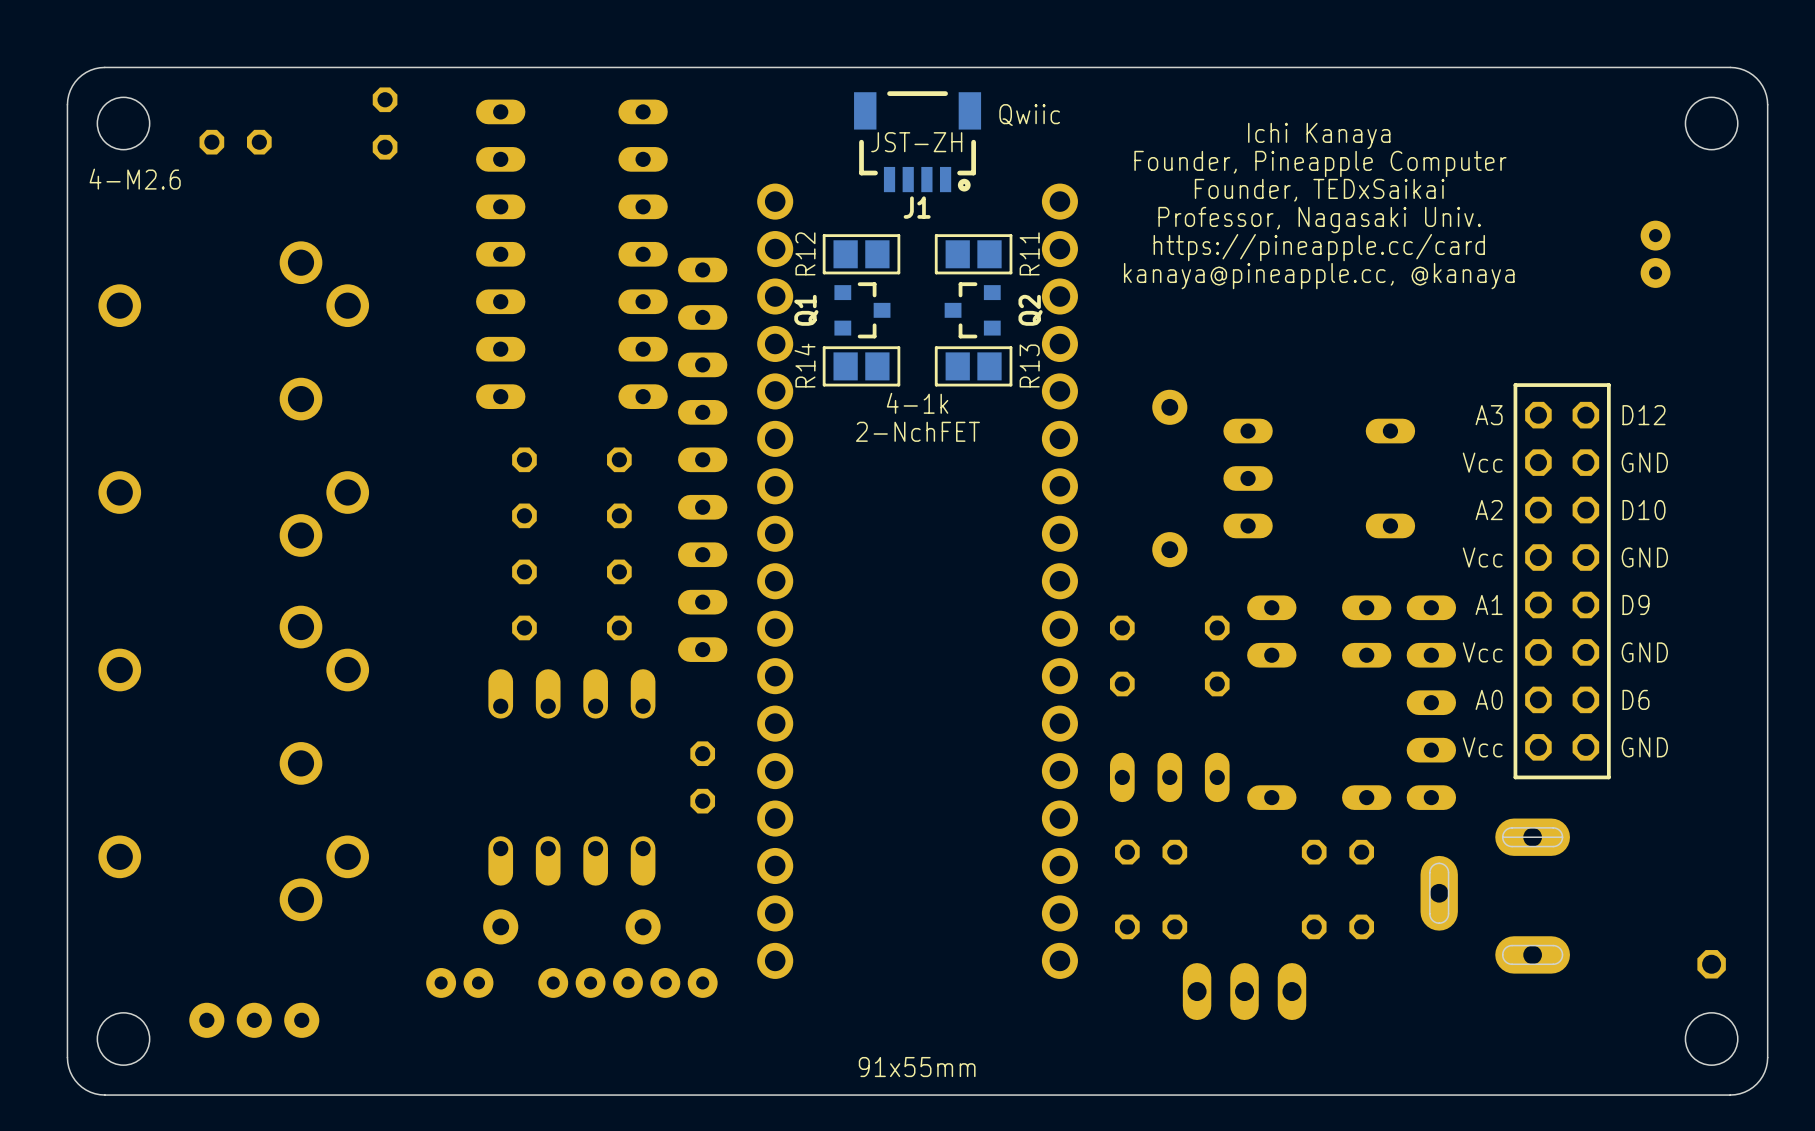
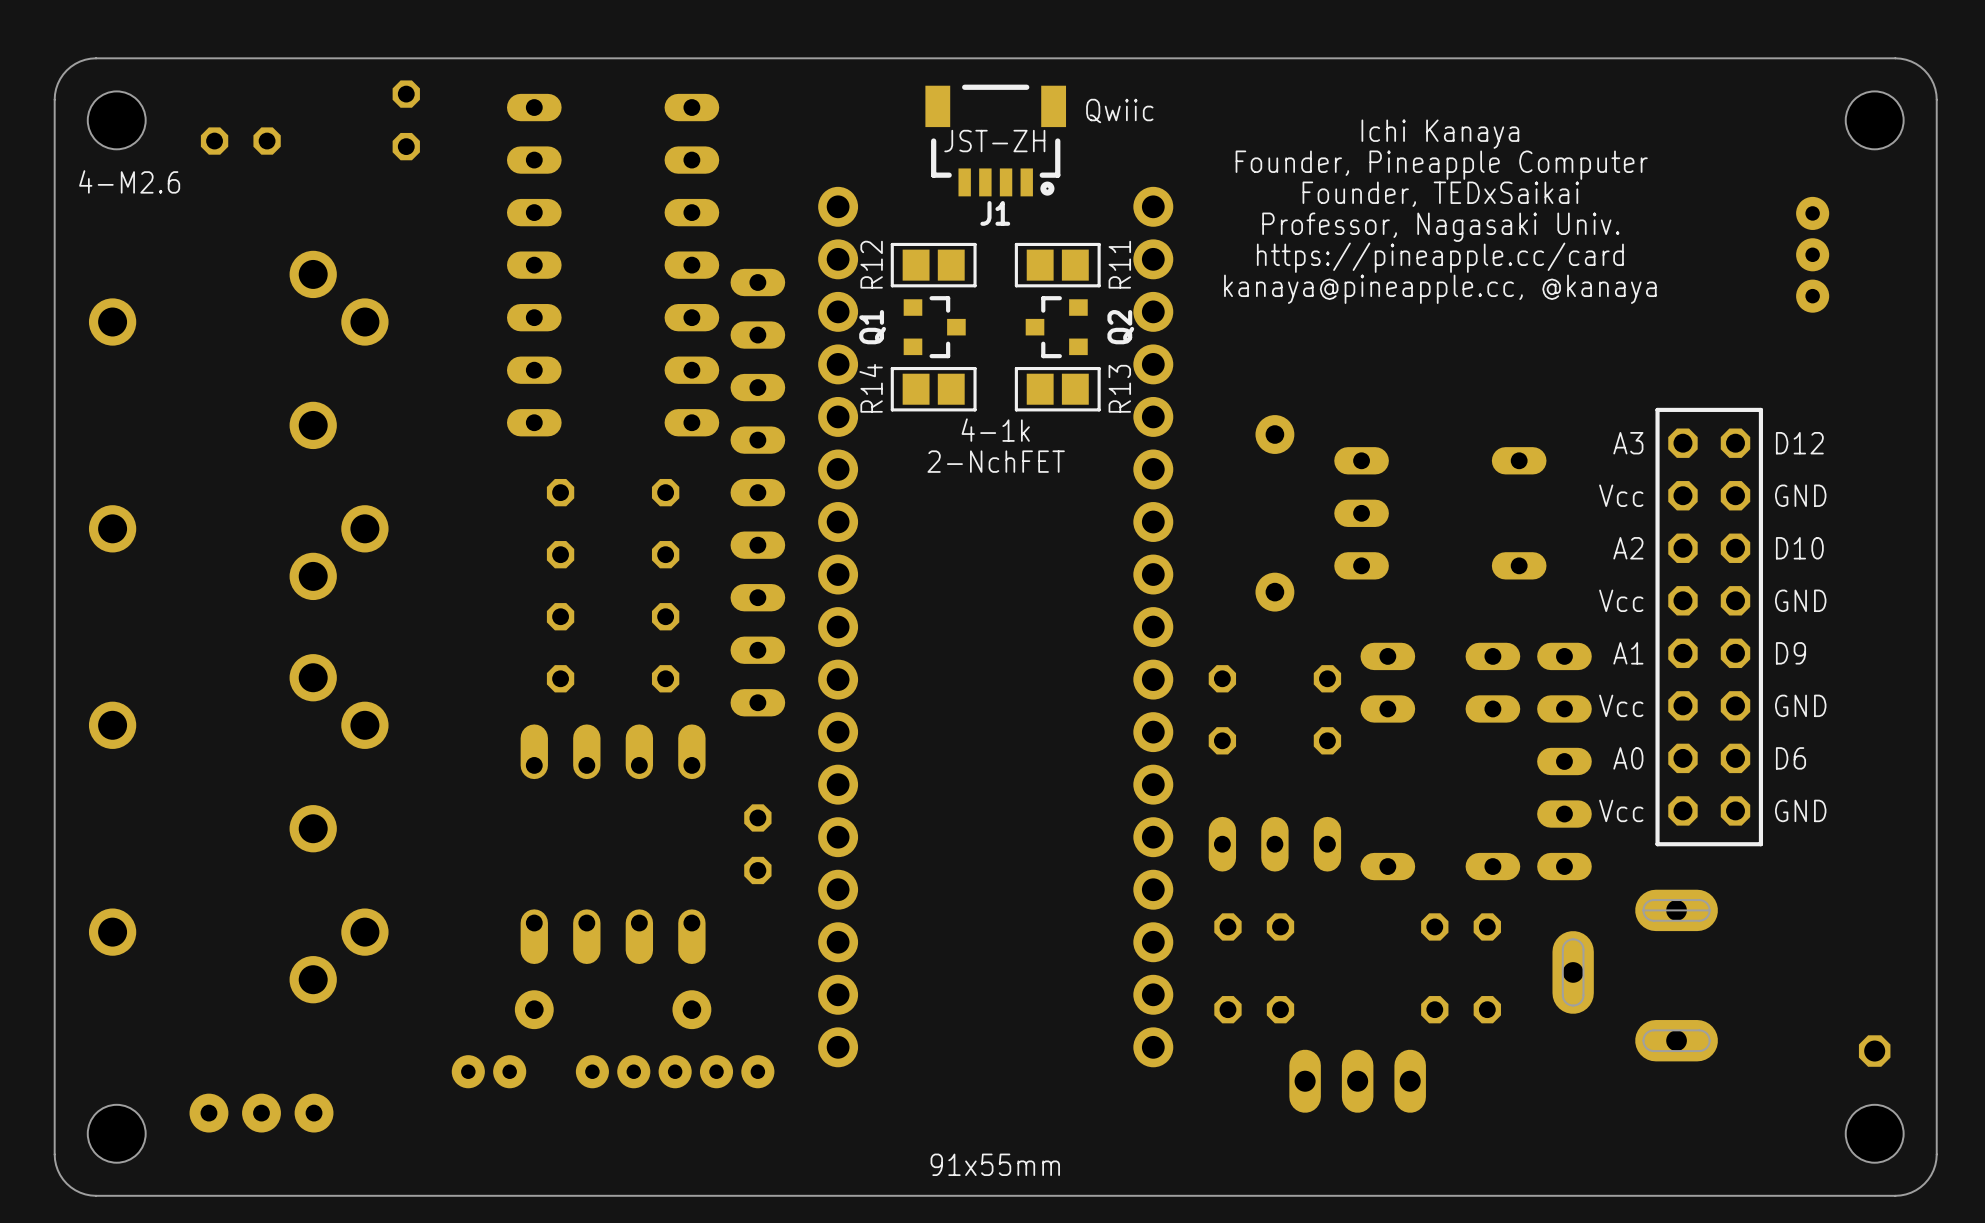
part footprint: [1640, 220, 1671, 288] -> [1796, 196, 1830, 313]

